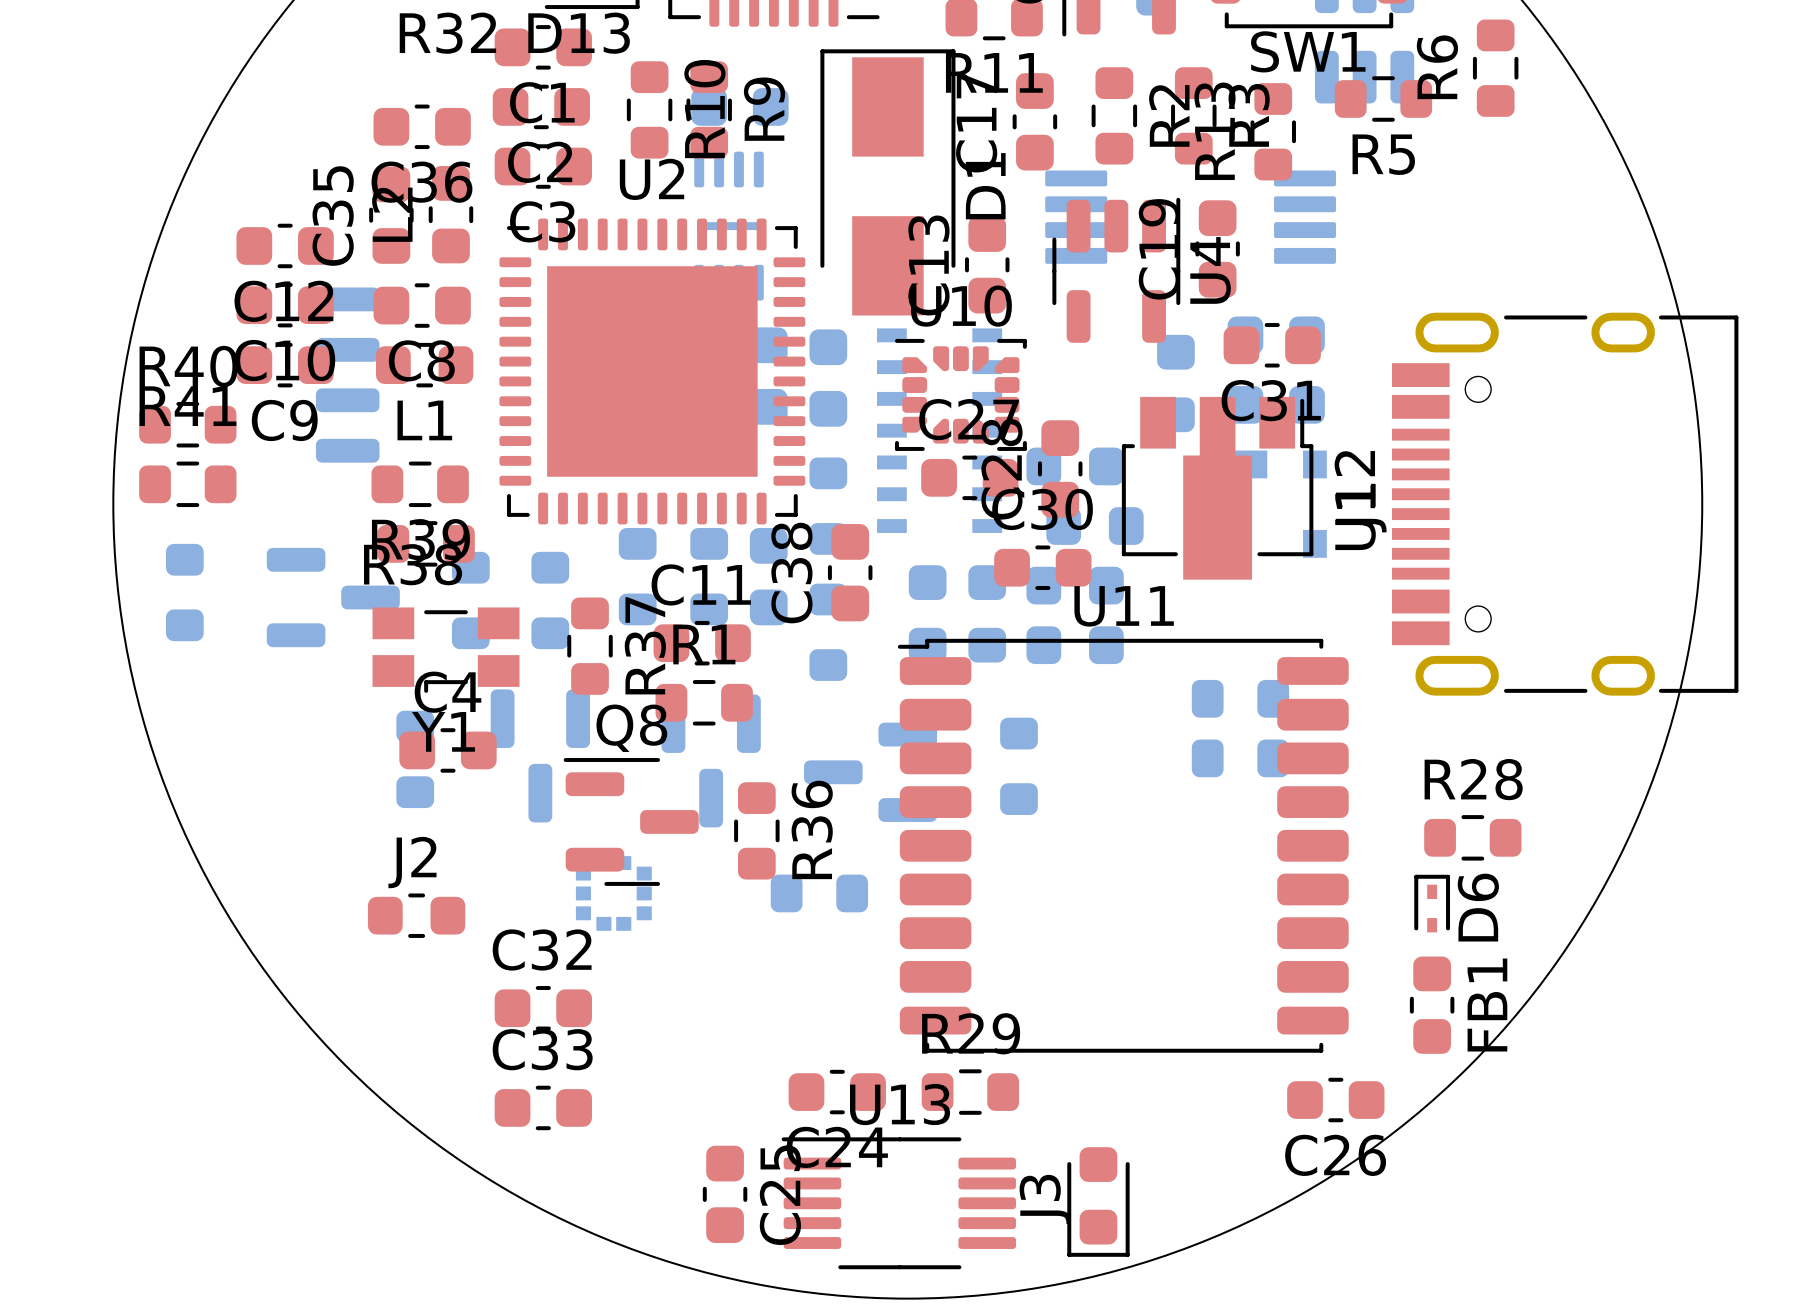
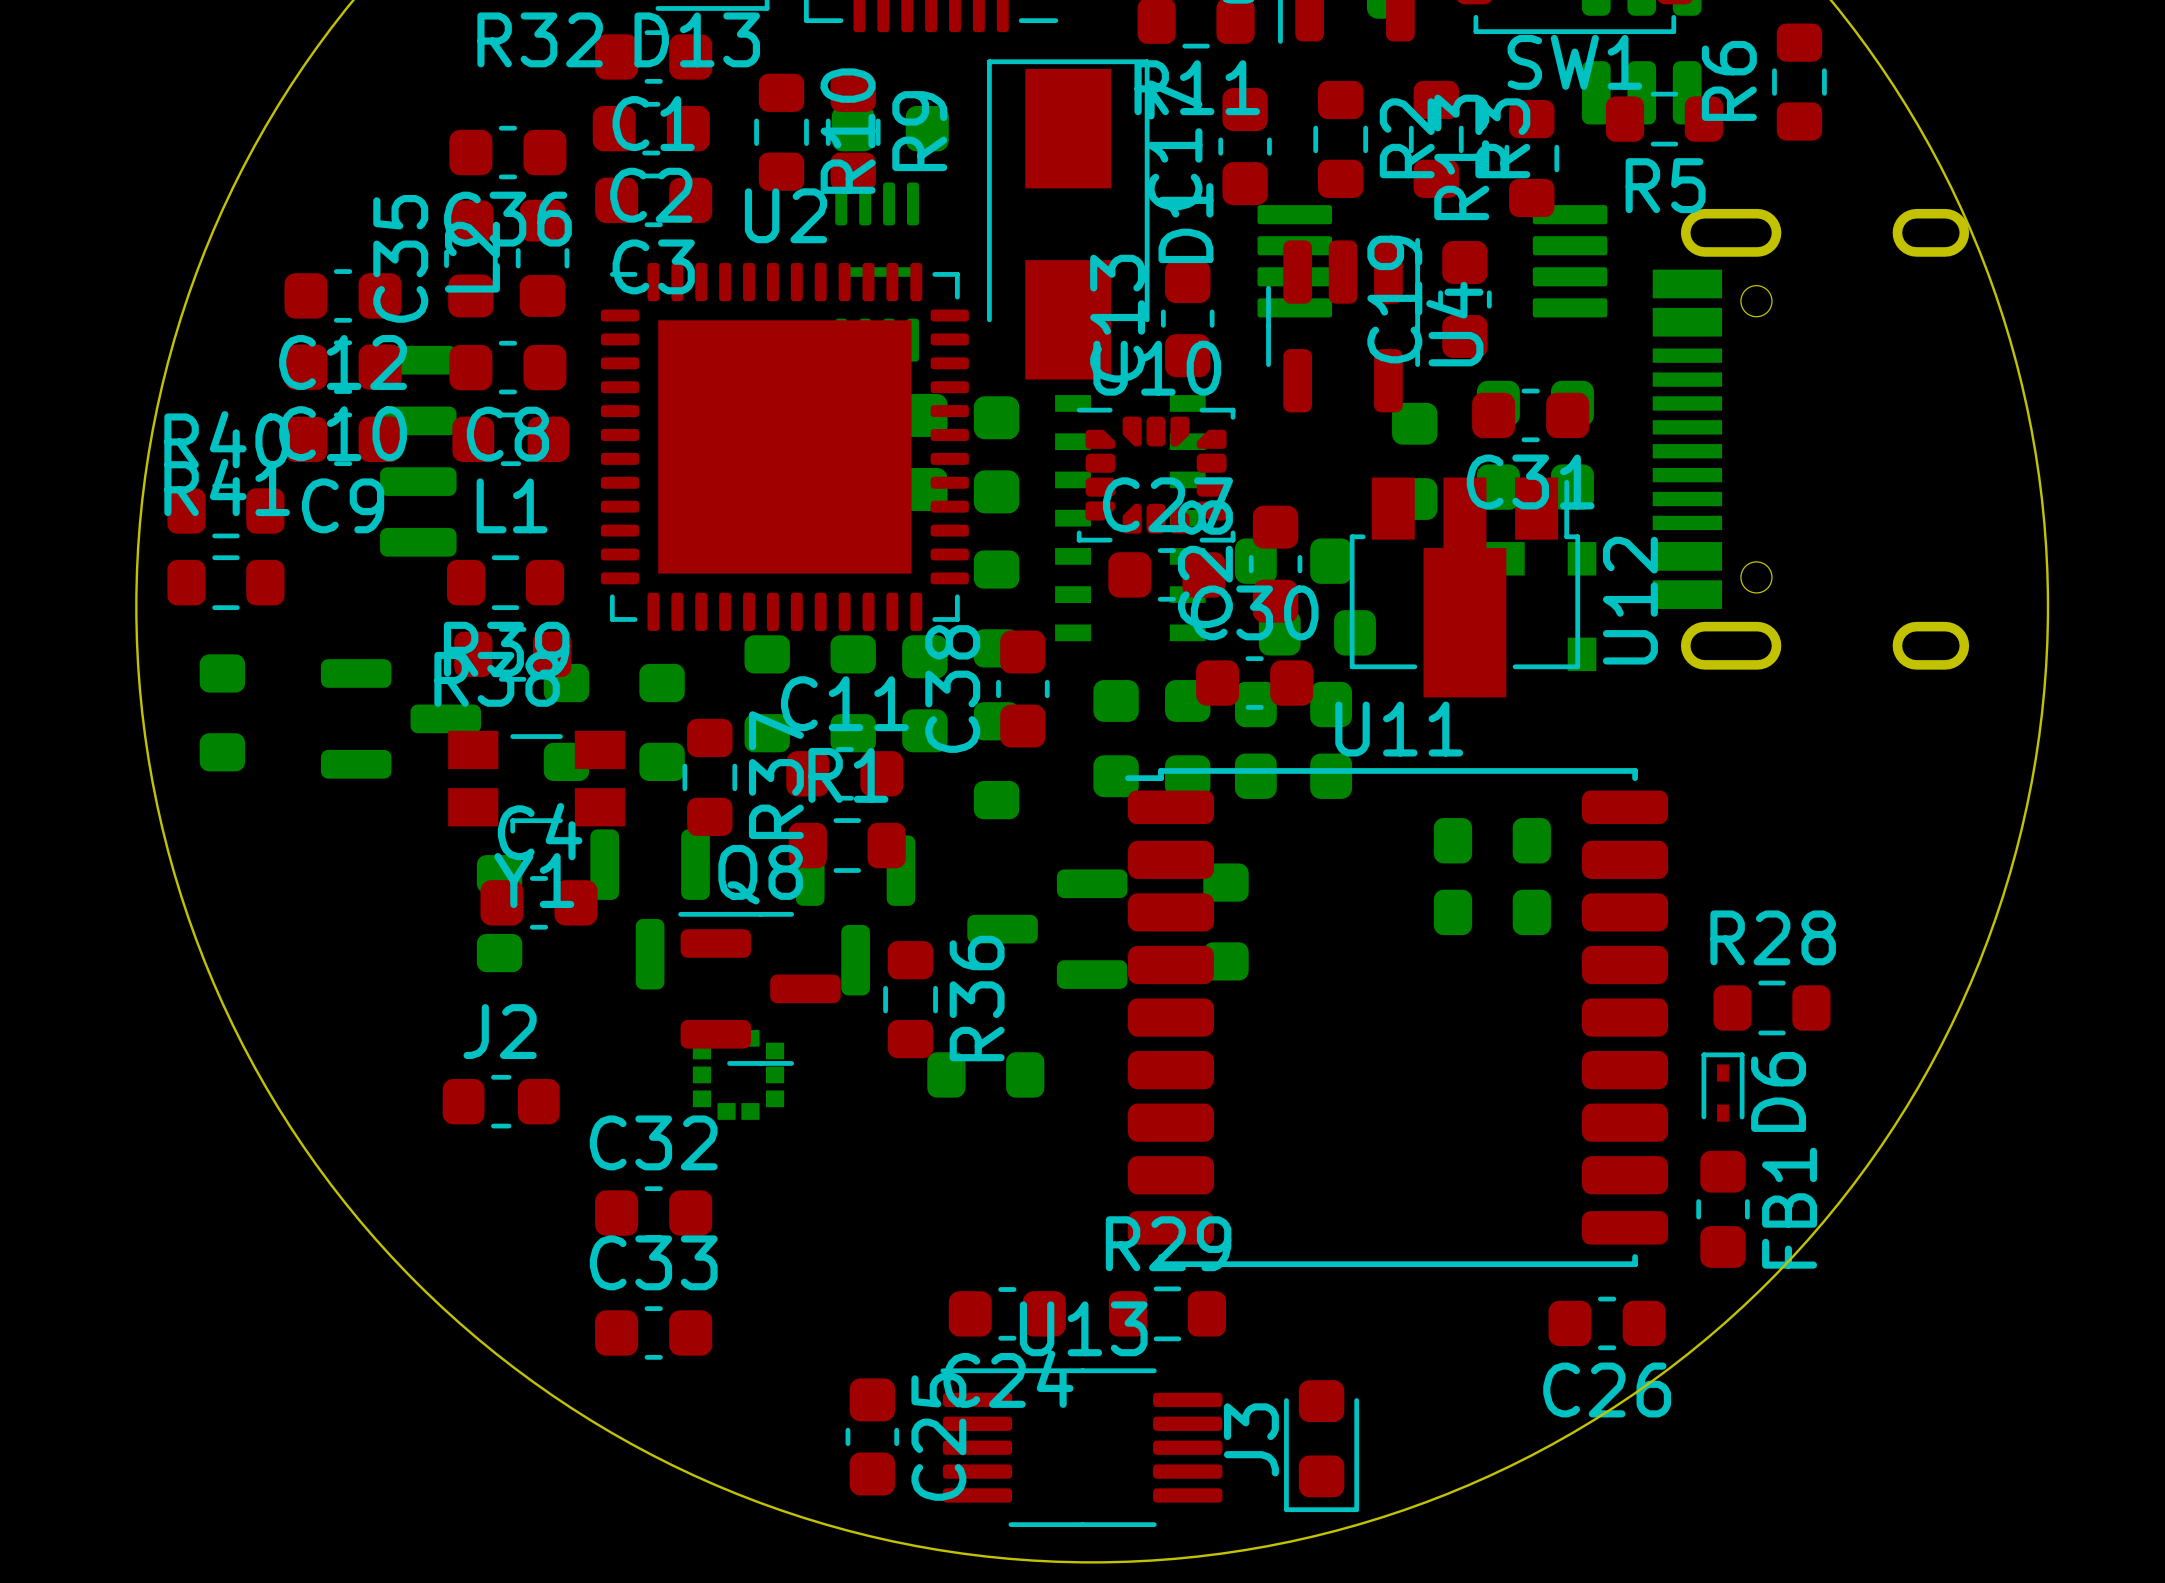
part side: top (1565, 504) -> bottom (1810, 439)
U11 name position: U11 (1124, 606) -> U11 (1399, 729)
U11 footprint: [897, 638, 1349, 1053] -> [1125, 768, 1669, 1268]

